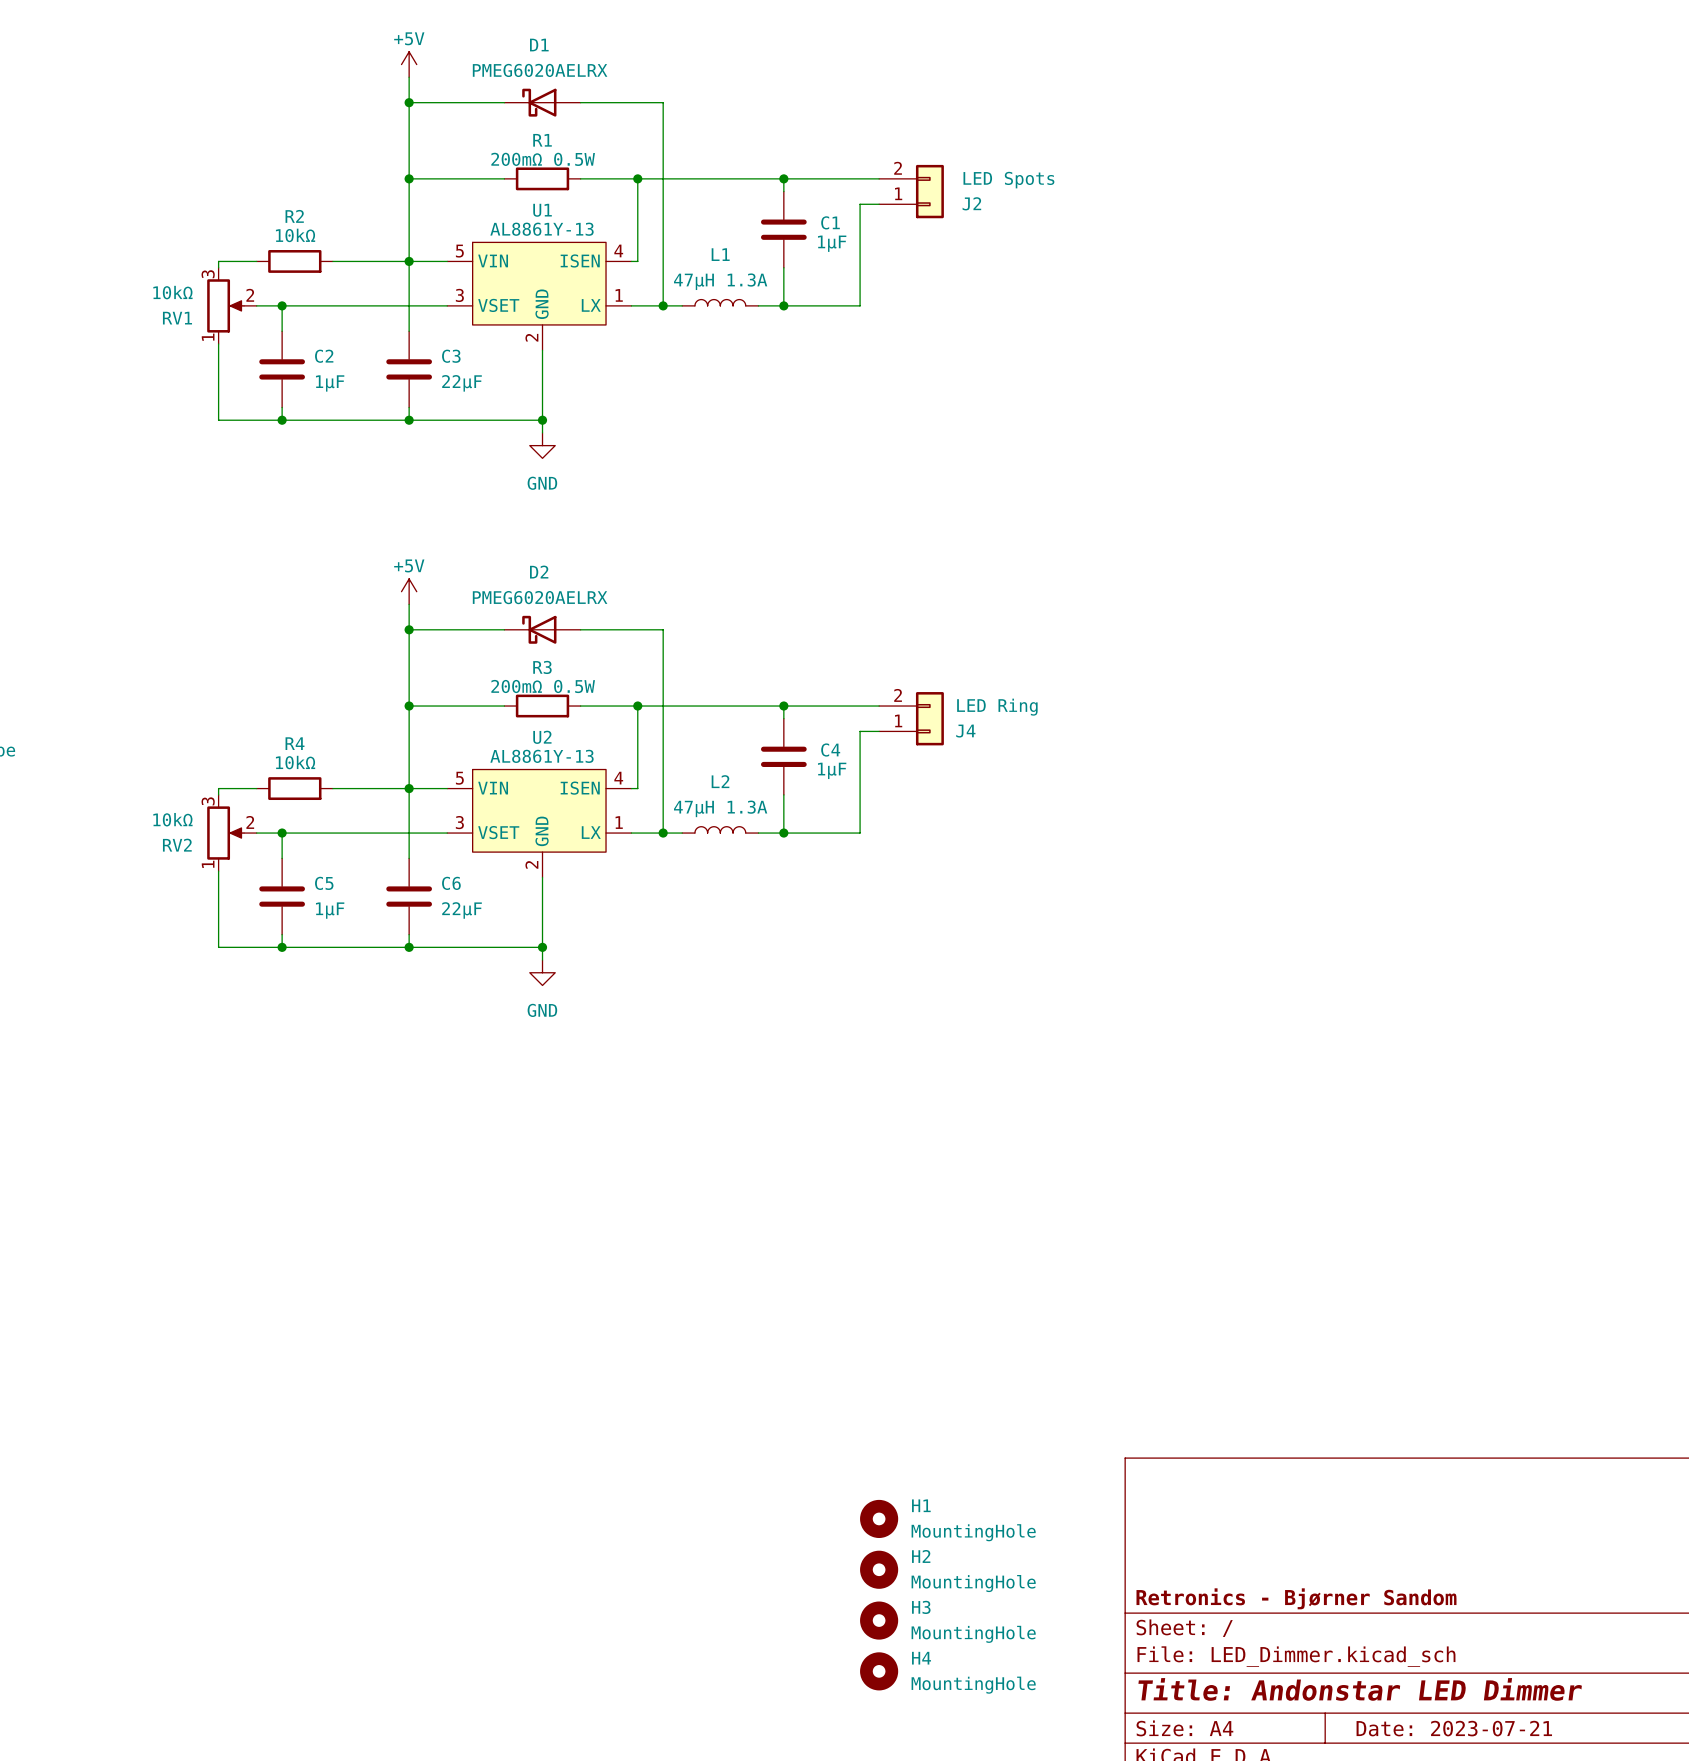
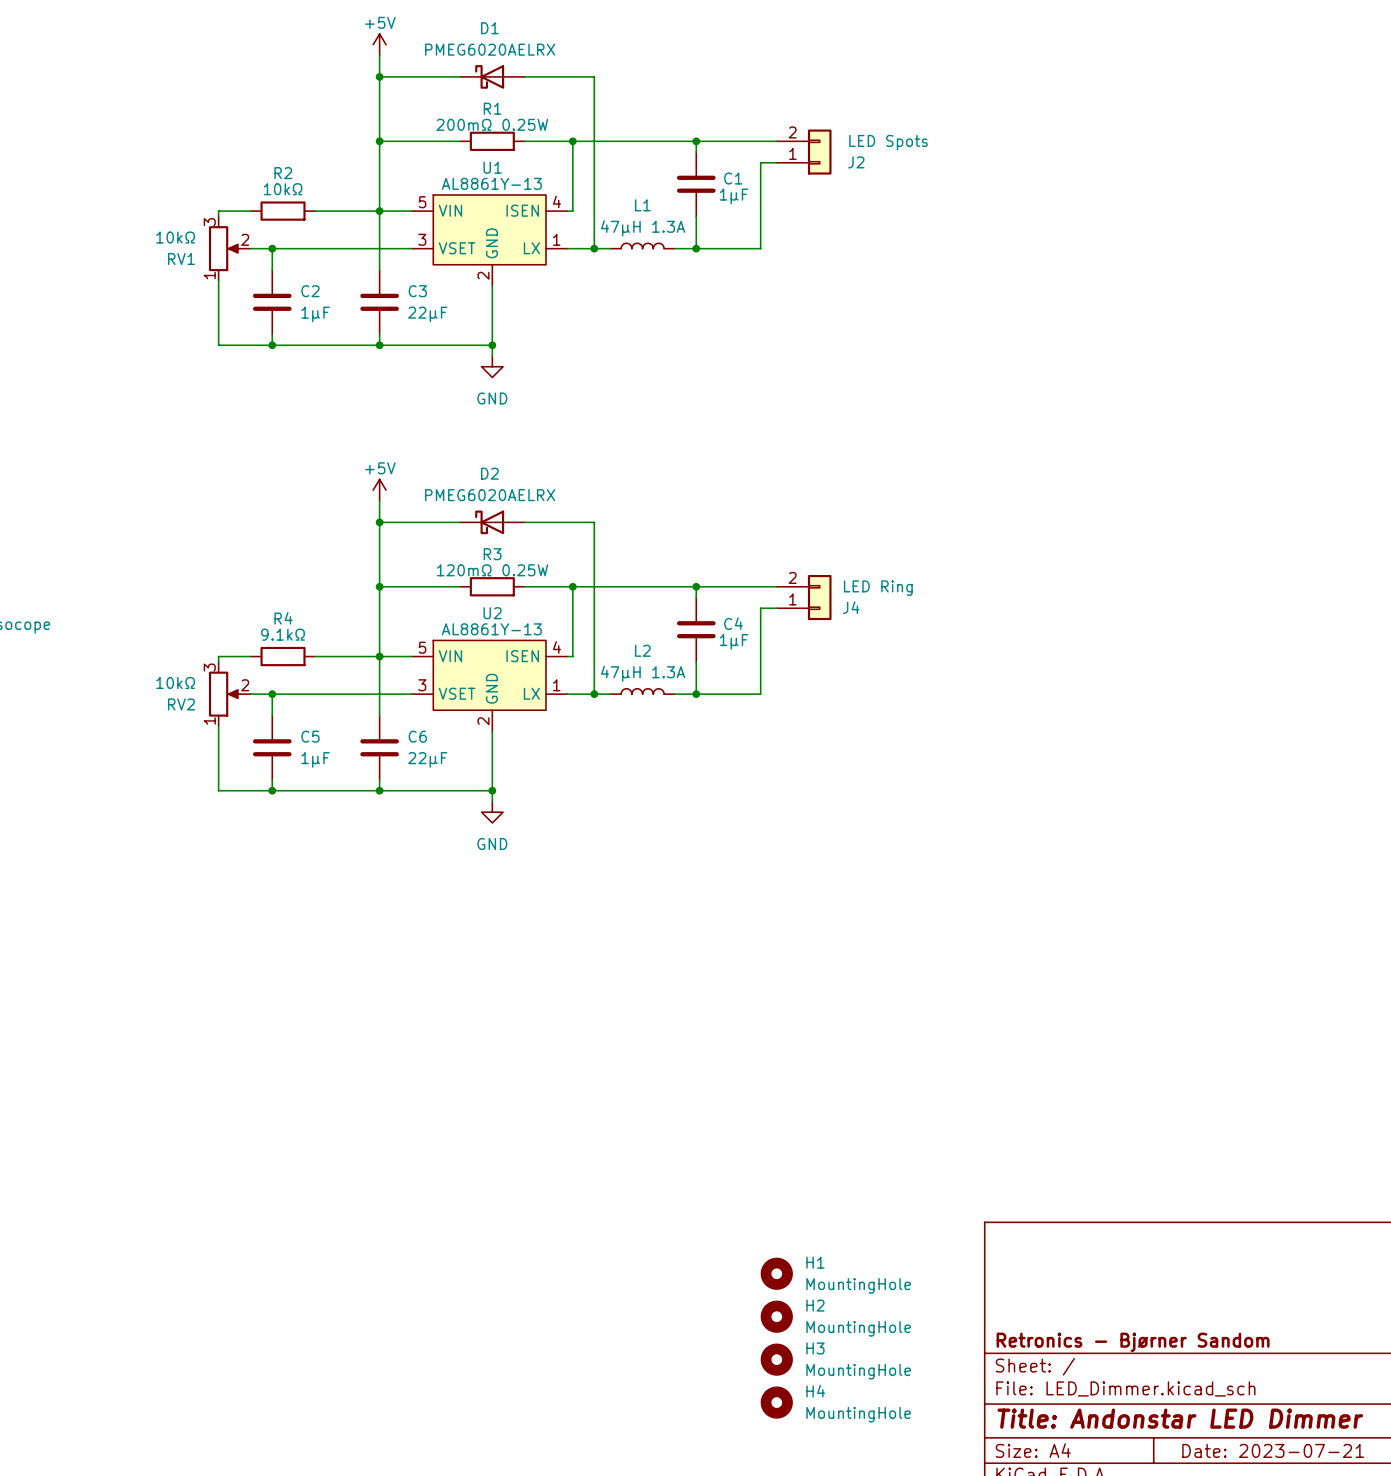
R1 value: 200mΩ 0.5W (543, 159) -> 200mΩ 0.25W (492, 124)
R3 value: 200mΩ 0.5W (543, 686) -> 120mΩ 0.25W (492, 570)
R4 value: 10kΩ (295, 762) -> 9.1kΩ (283, 634)

